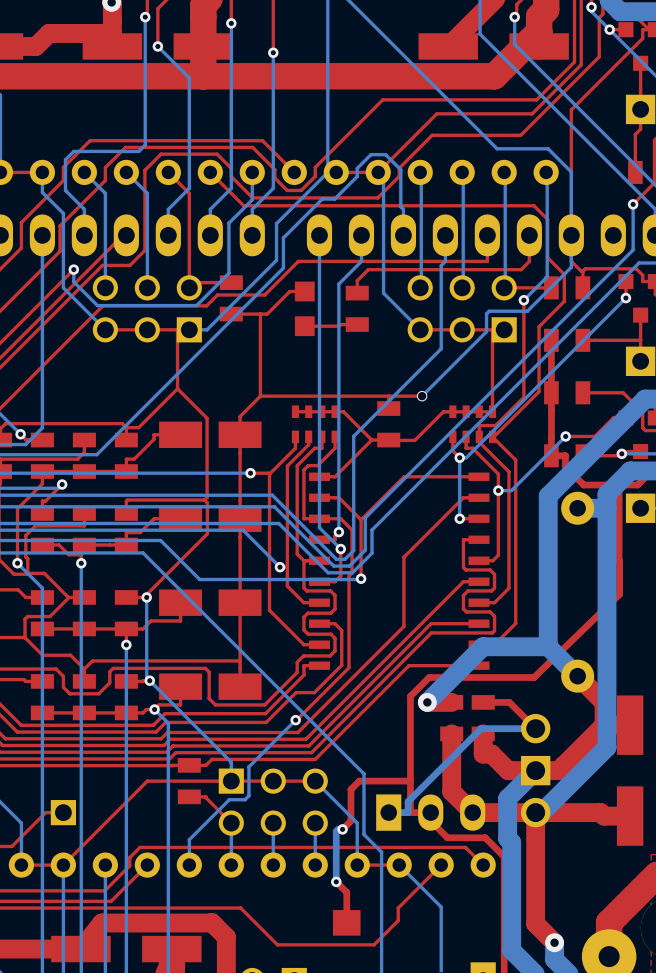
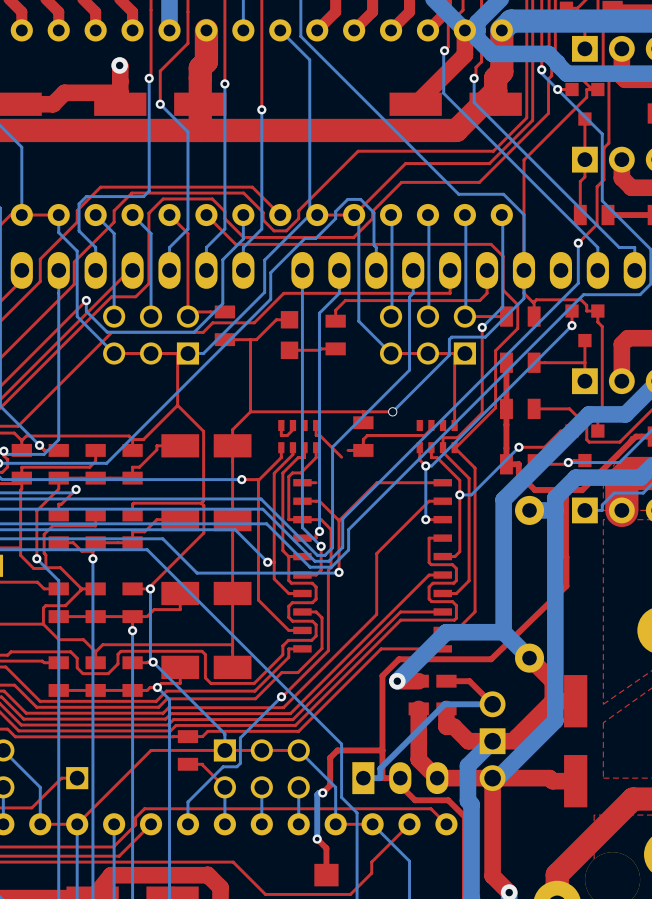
top track: (295, 411) (343, 411) (371, 440) (335, 476) -> (281, 425) (281, 435) (287, 435) (292, 429)
top track: none -> (316, 425) (316, 435) (319, 435) (341, 457)
top track: (492, 411) (443, 411) (414, 440) (389, 440) -> (431, 425) (431, 428) (424, 435) (367, 435) (363, 439) (363, 450)

